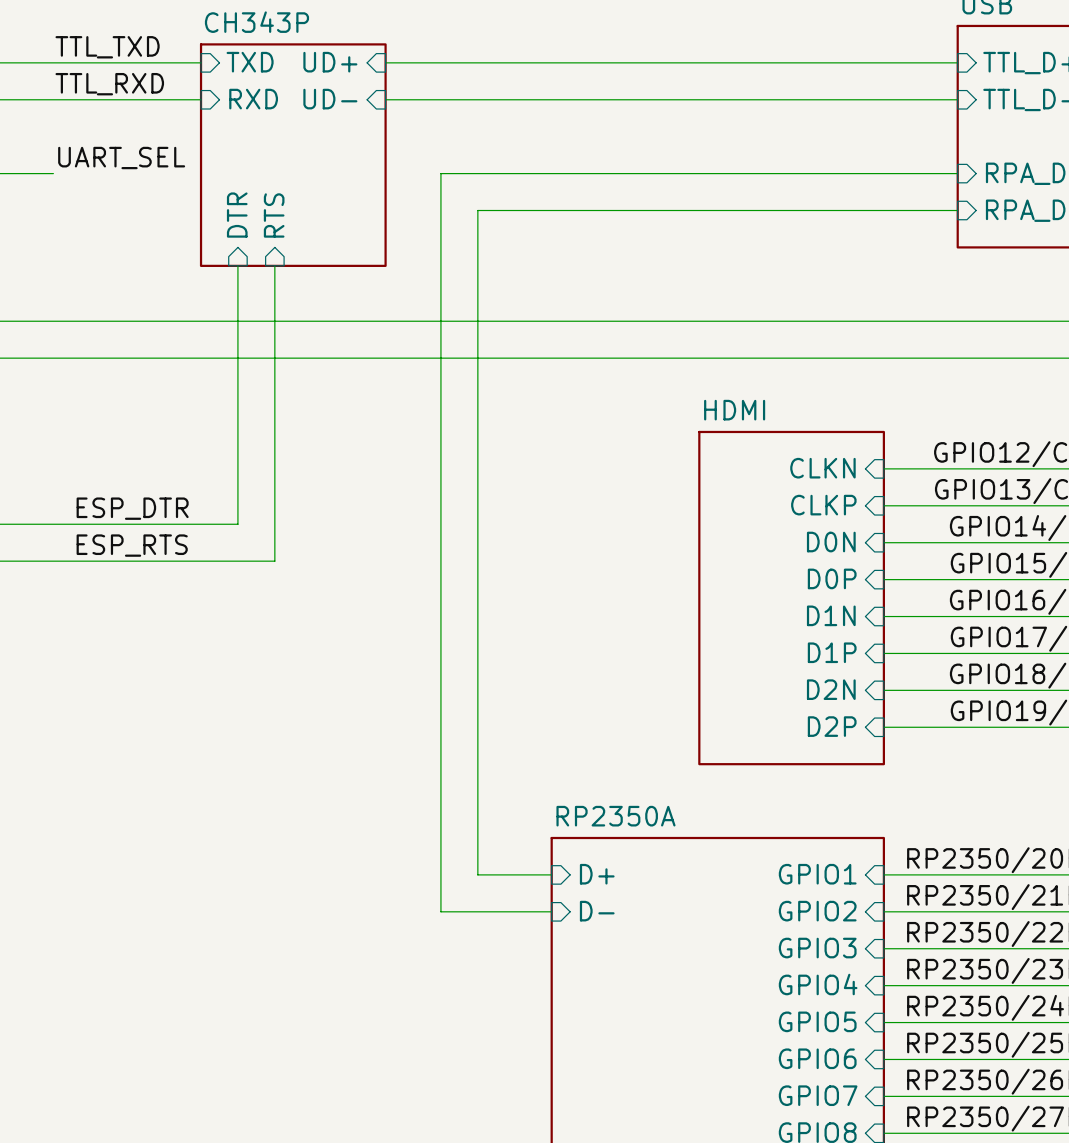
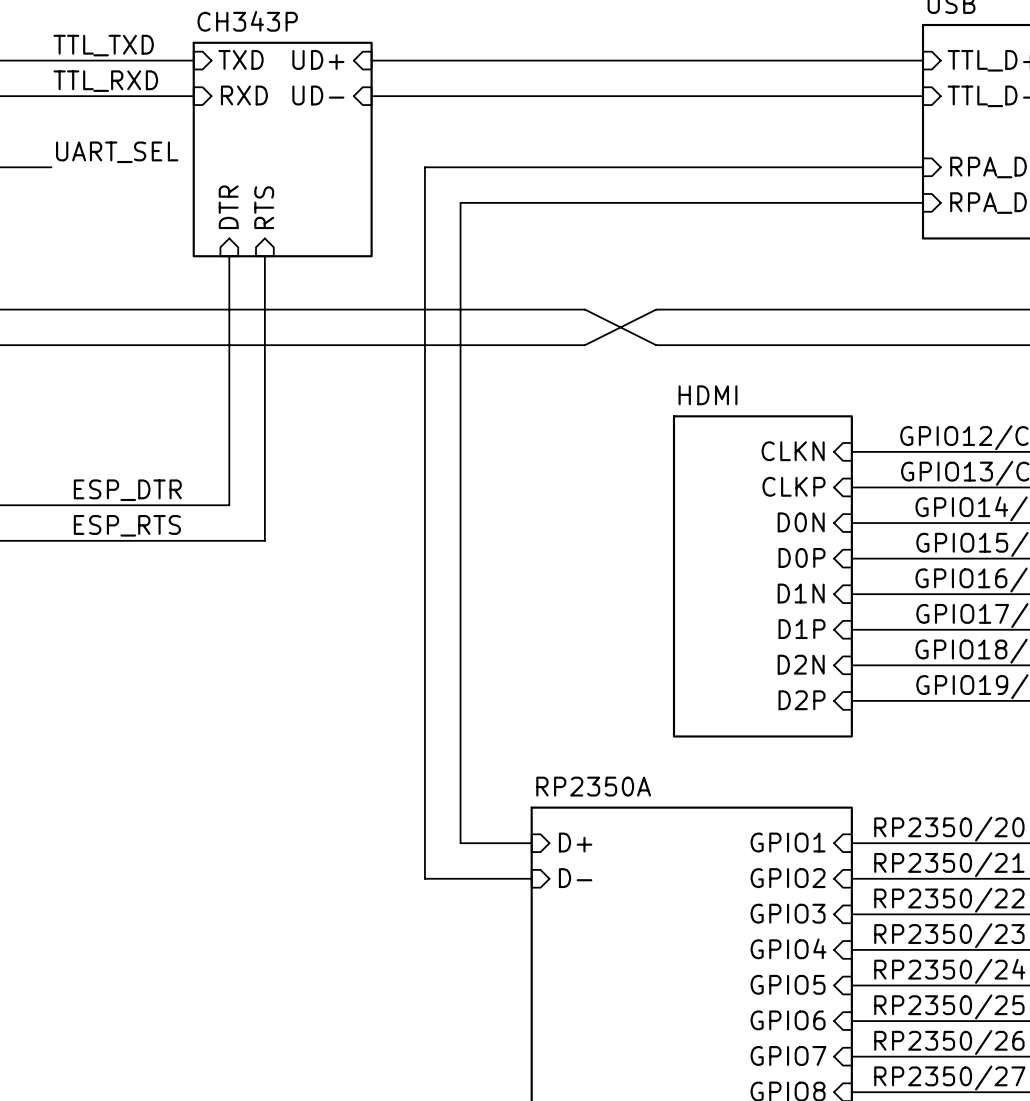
wire: (607, 321) (680, 321) -> (585, 309) (656, 345)
wire: (607, 358) (680, 358) -> (585, 345) (656, 309)

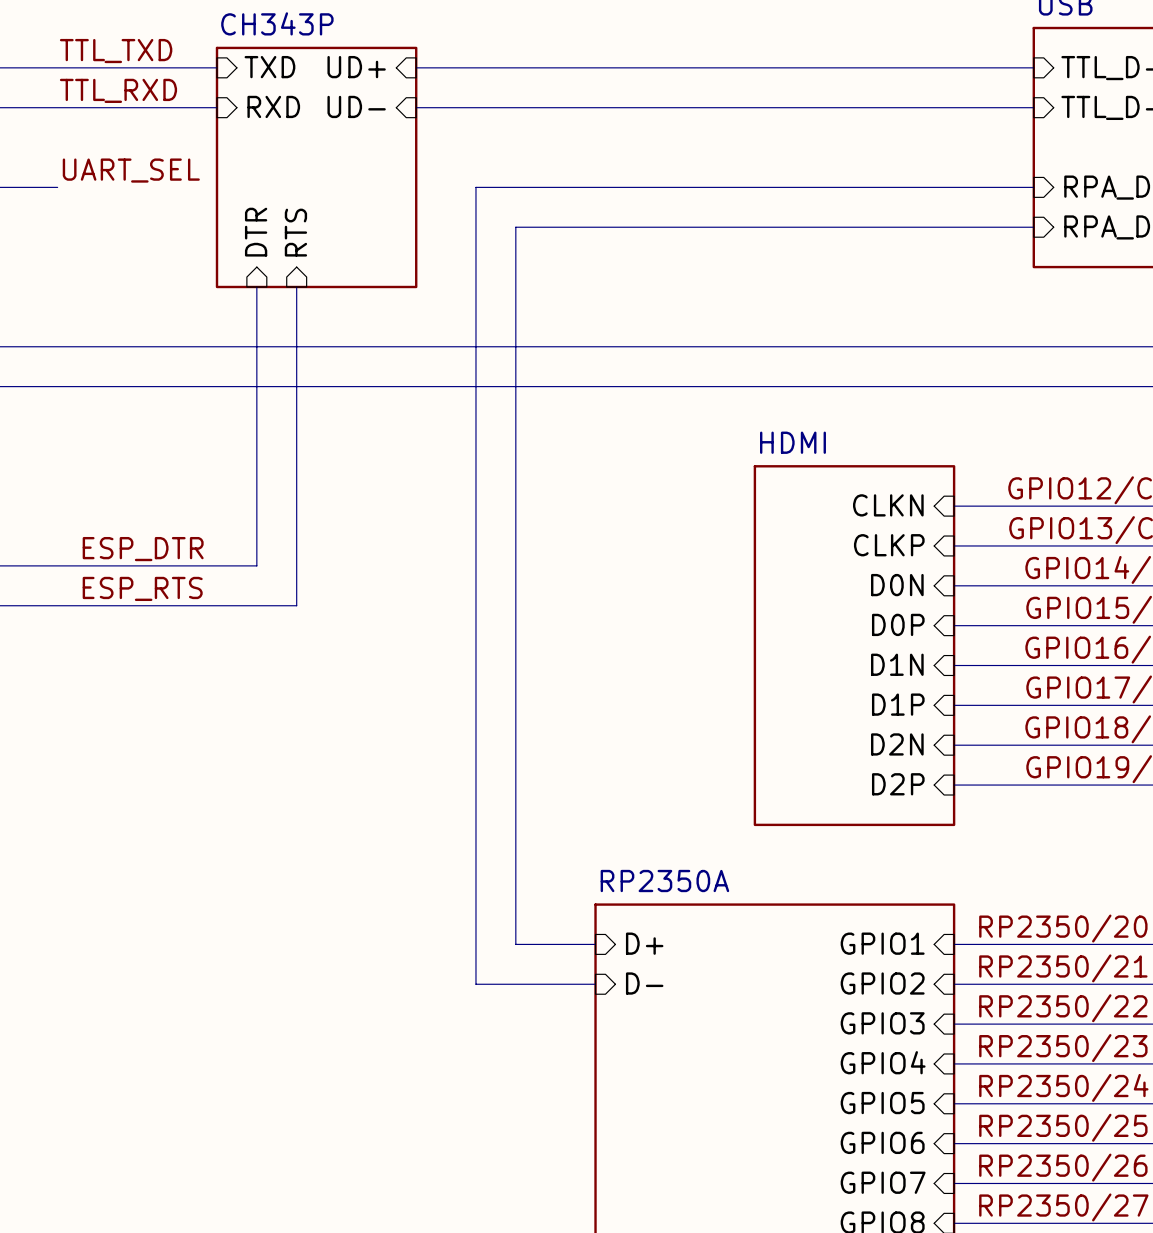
wire: (585, 309) (656, 345) -> (655, 346) (734, 346)
wire: (656, 309) (585, 345) -> (734, 386) (655, 386)

